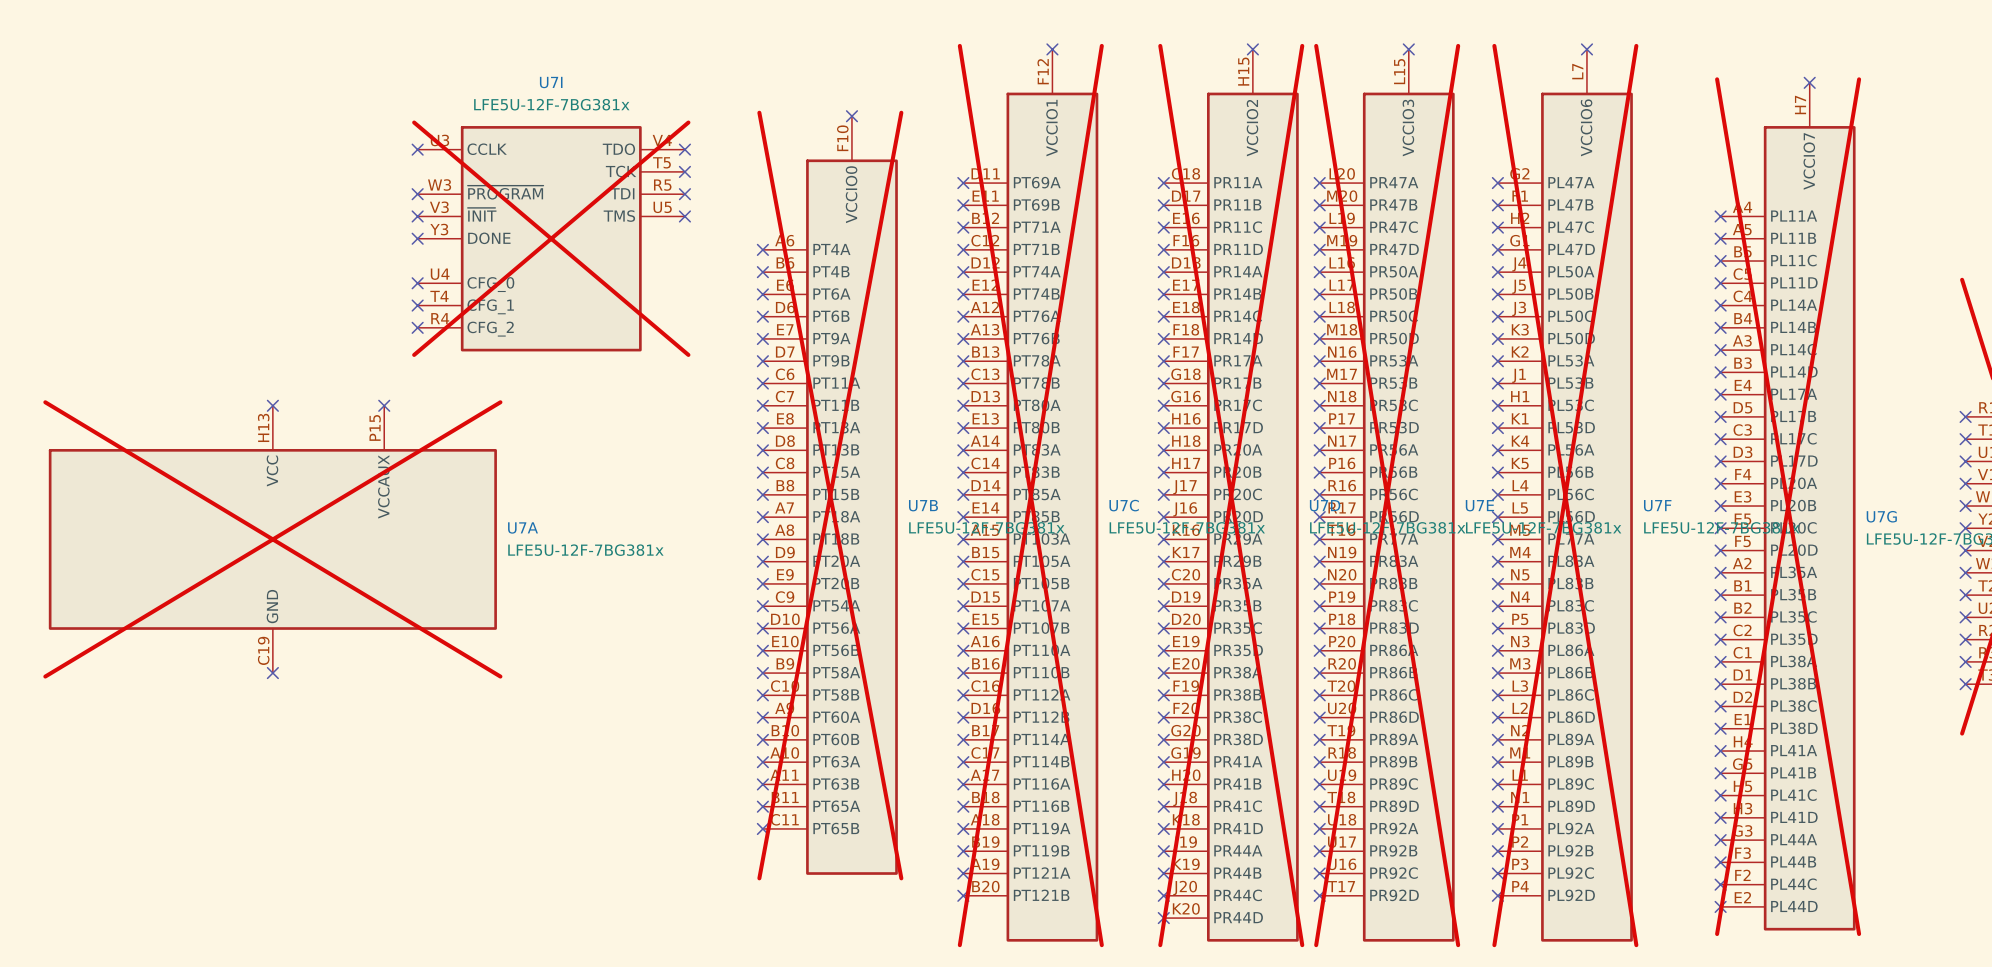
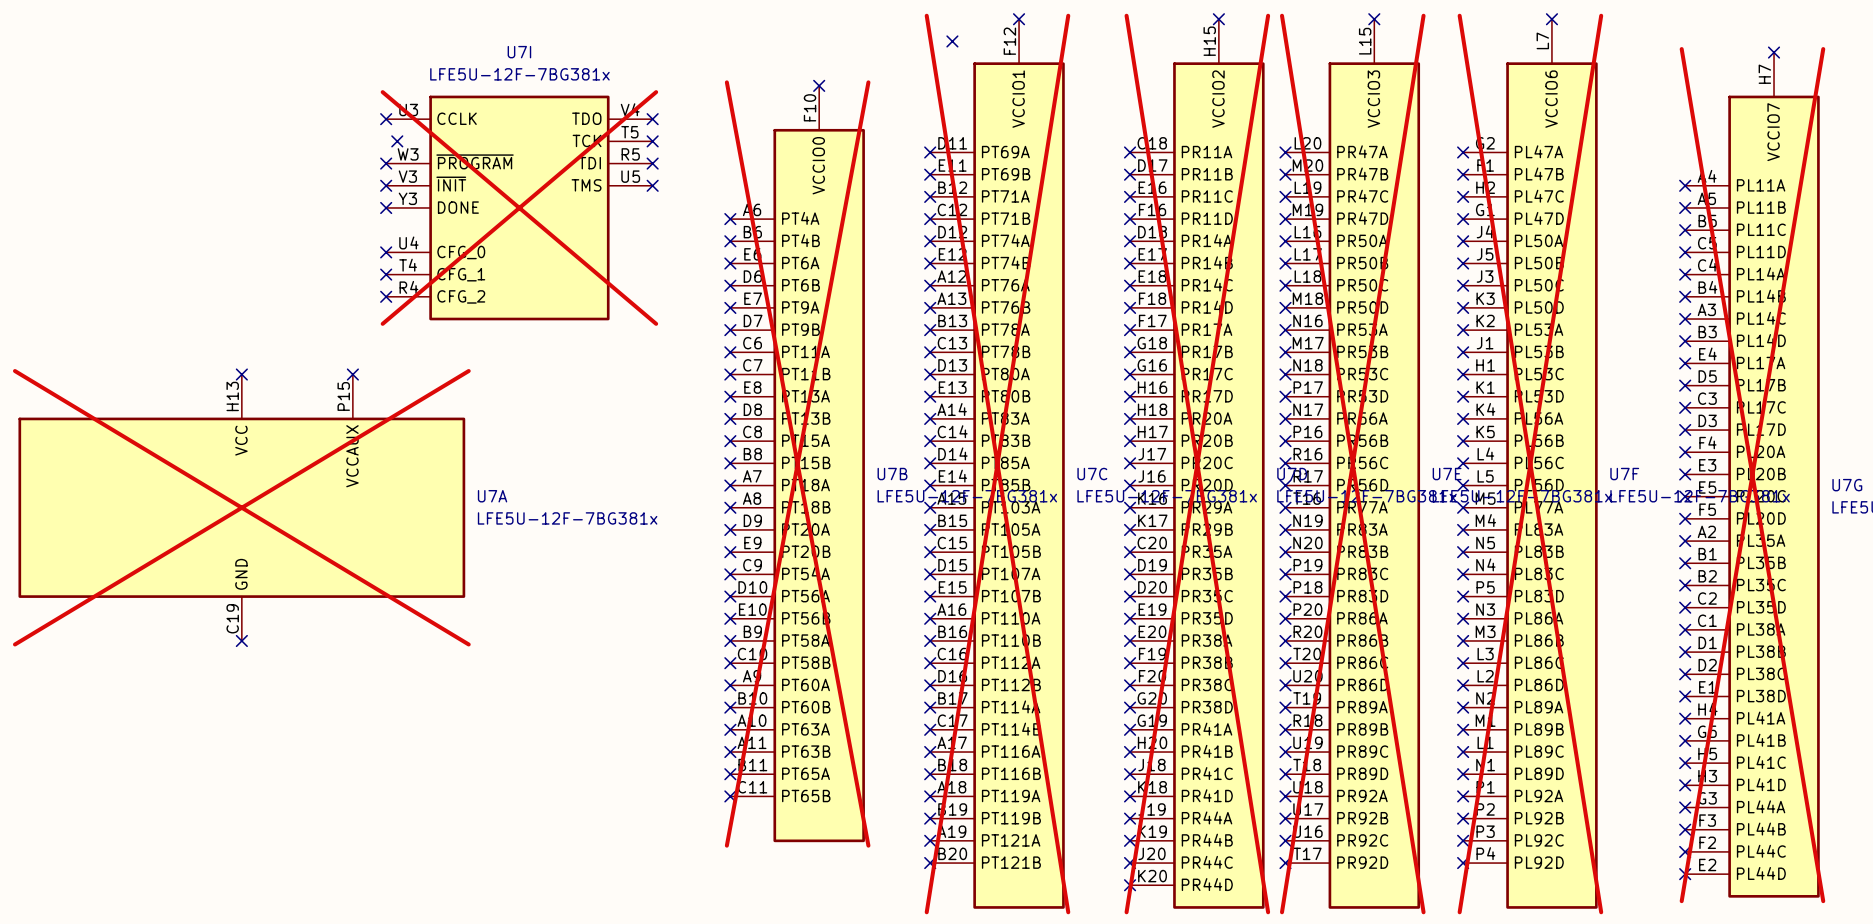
no-connect mark: none -> (952, 41)
no-connect mark: none -> (397, 141)

